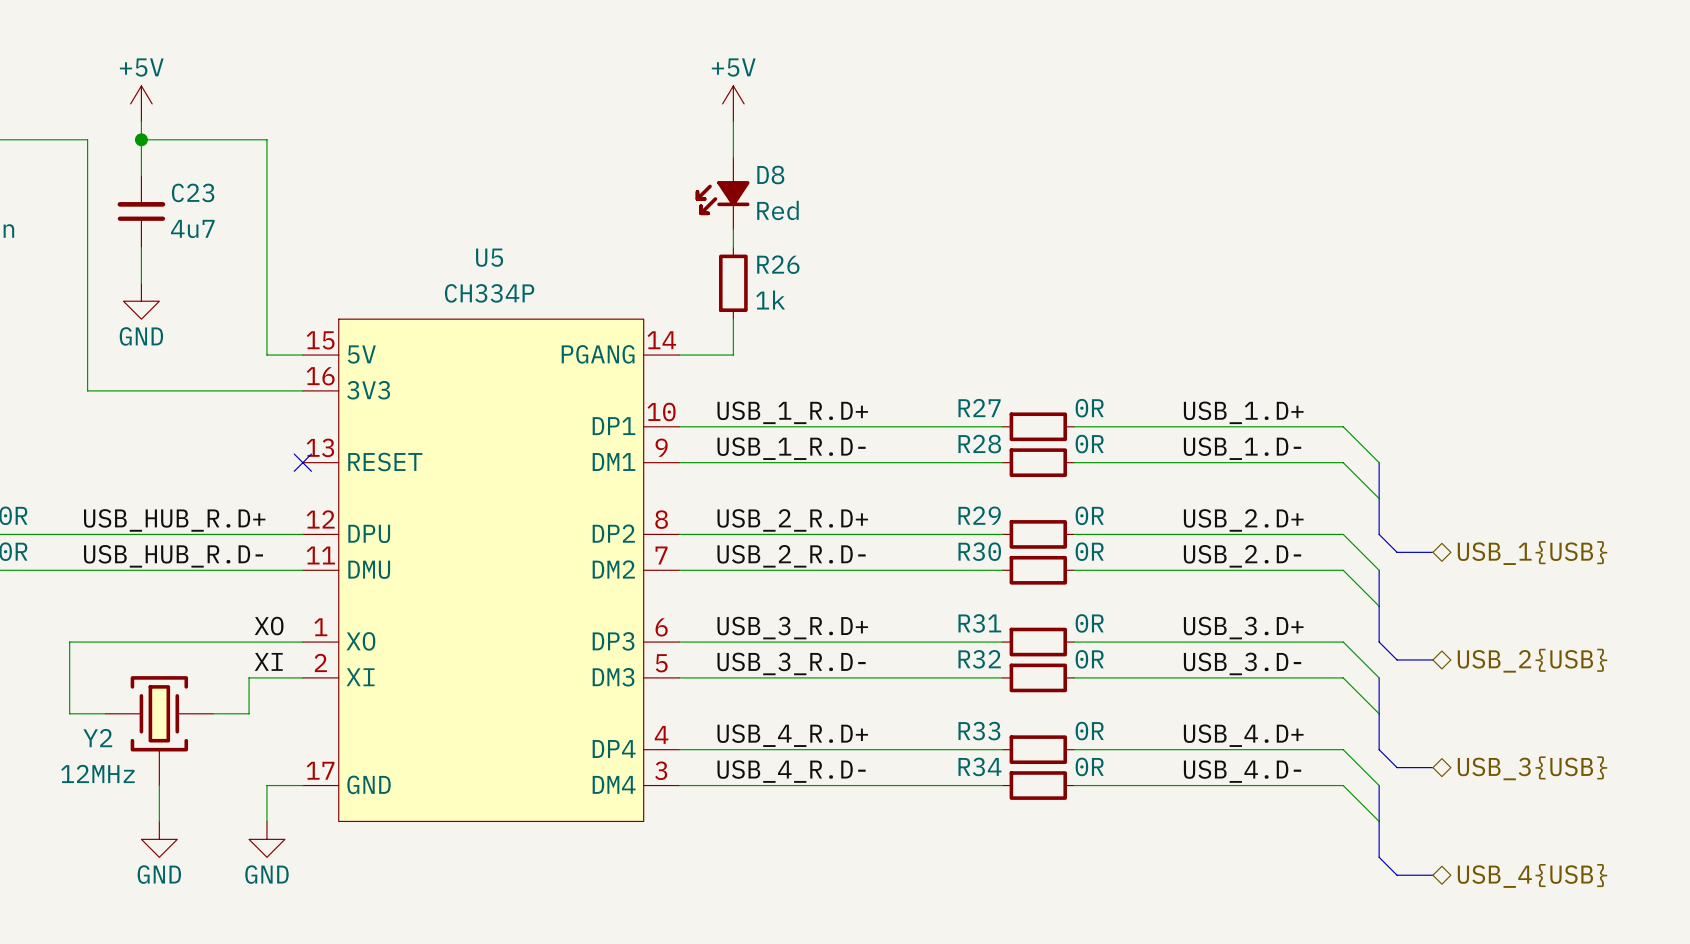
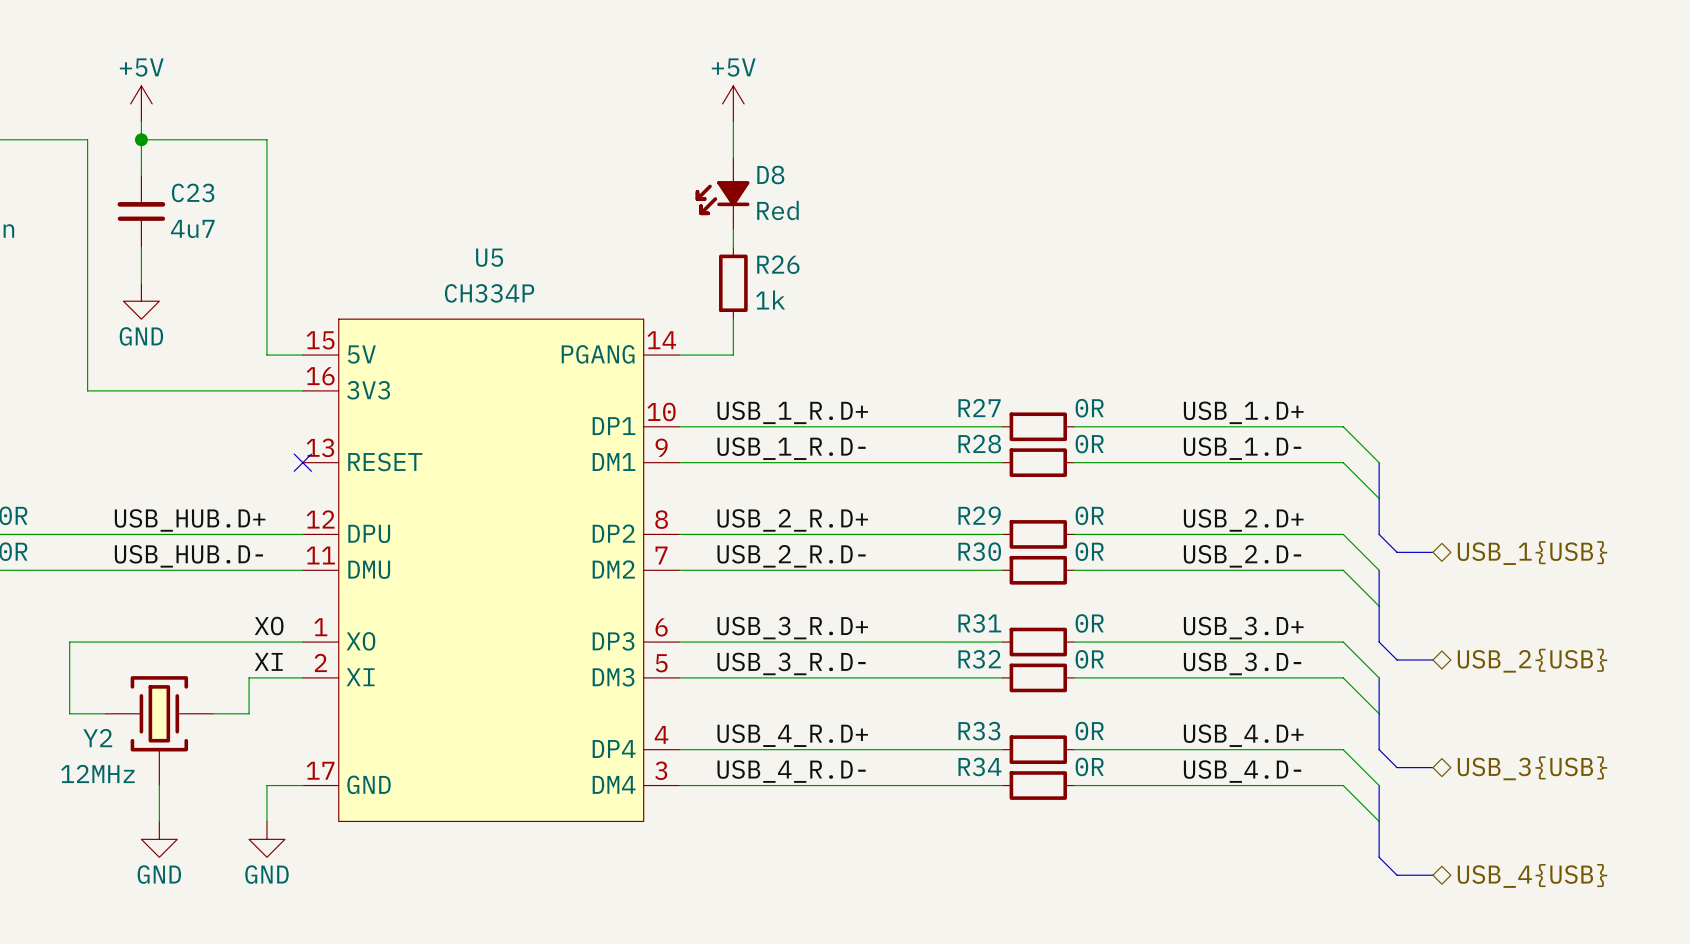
label: USB_HUB_R.D+ (174, 520) -> USB_HUB.D+ (190, 520)
label: USB_HUB_R.D- (173, 556) -> USB_HUB.D- (188, 556)

